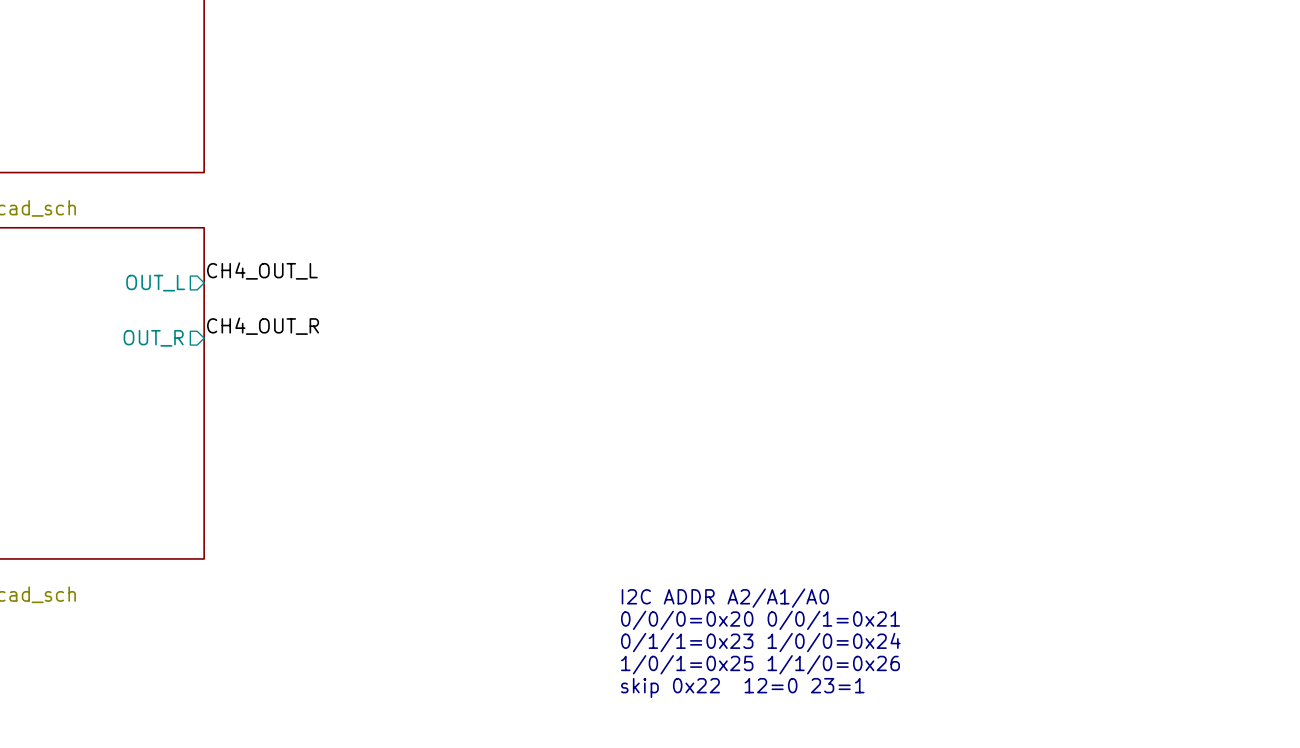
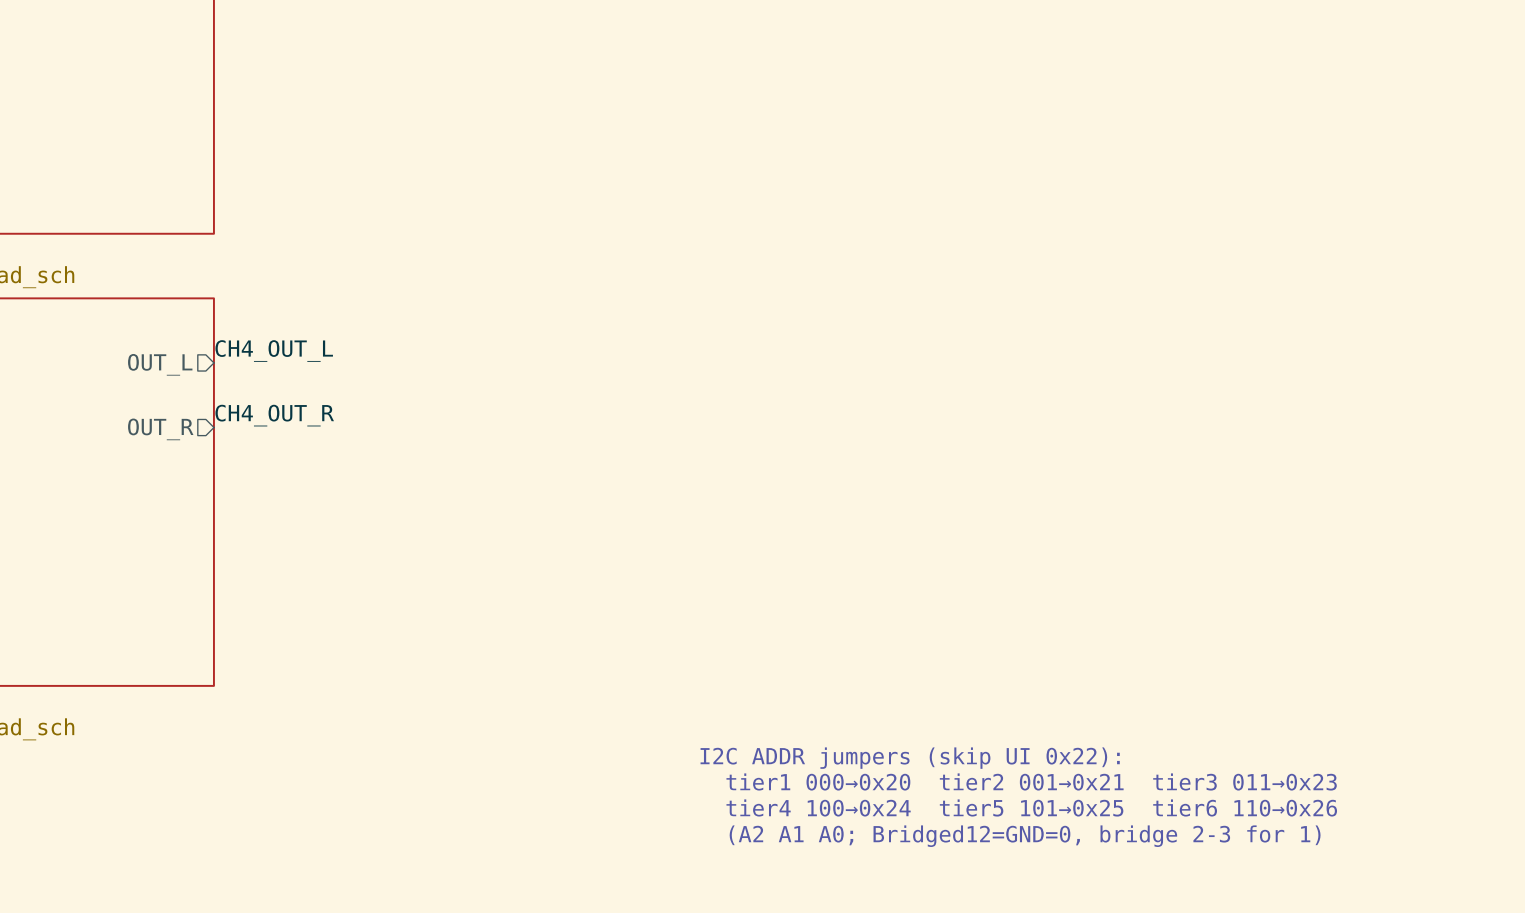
text: I2C ADDR A2/A1/A0 (725, 598) -> none
text: 0/0/0=0x20 0/0/1=0x21 (760, 620) -> I2C ADDR jumpers (skip UI 0x22): (910, 758)
text: 0/1/1=0x23 1/0/0=0x24 (760, 642) -> tier1 000→0x20 tier2 001→0x21 tier3 011→0x23 (1031, 781)
text: 1/0/1=0x25 1/1/0=0x26 (760, 664) -> tier4 100→0x24 tier5 101→0x25 tier6 110→0x26 (1031, 807)
text: skip 0x22 12=0 23=1 (742, 687) -> (A2 A1 A0; Bridged12=GND=0, bridge 2-3 for 1) (1025, 836)

